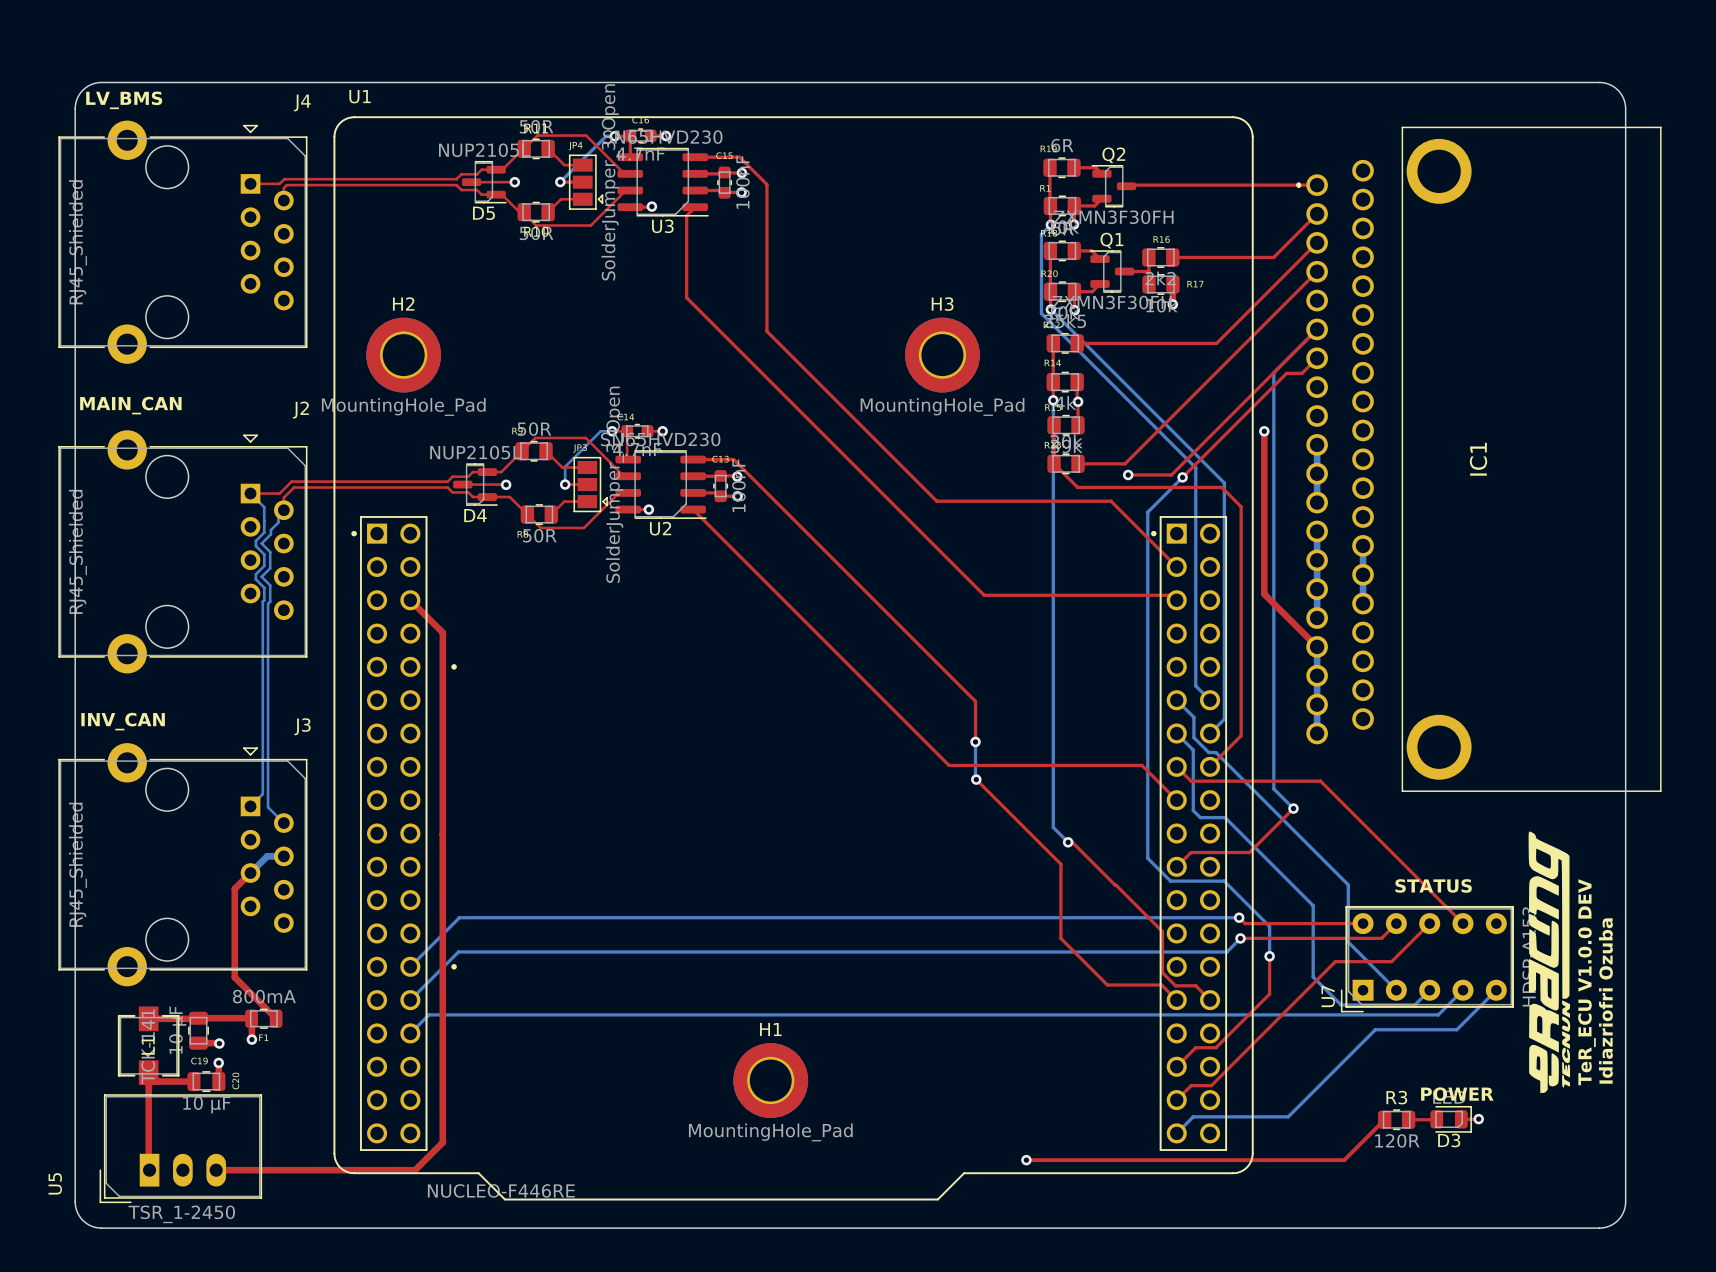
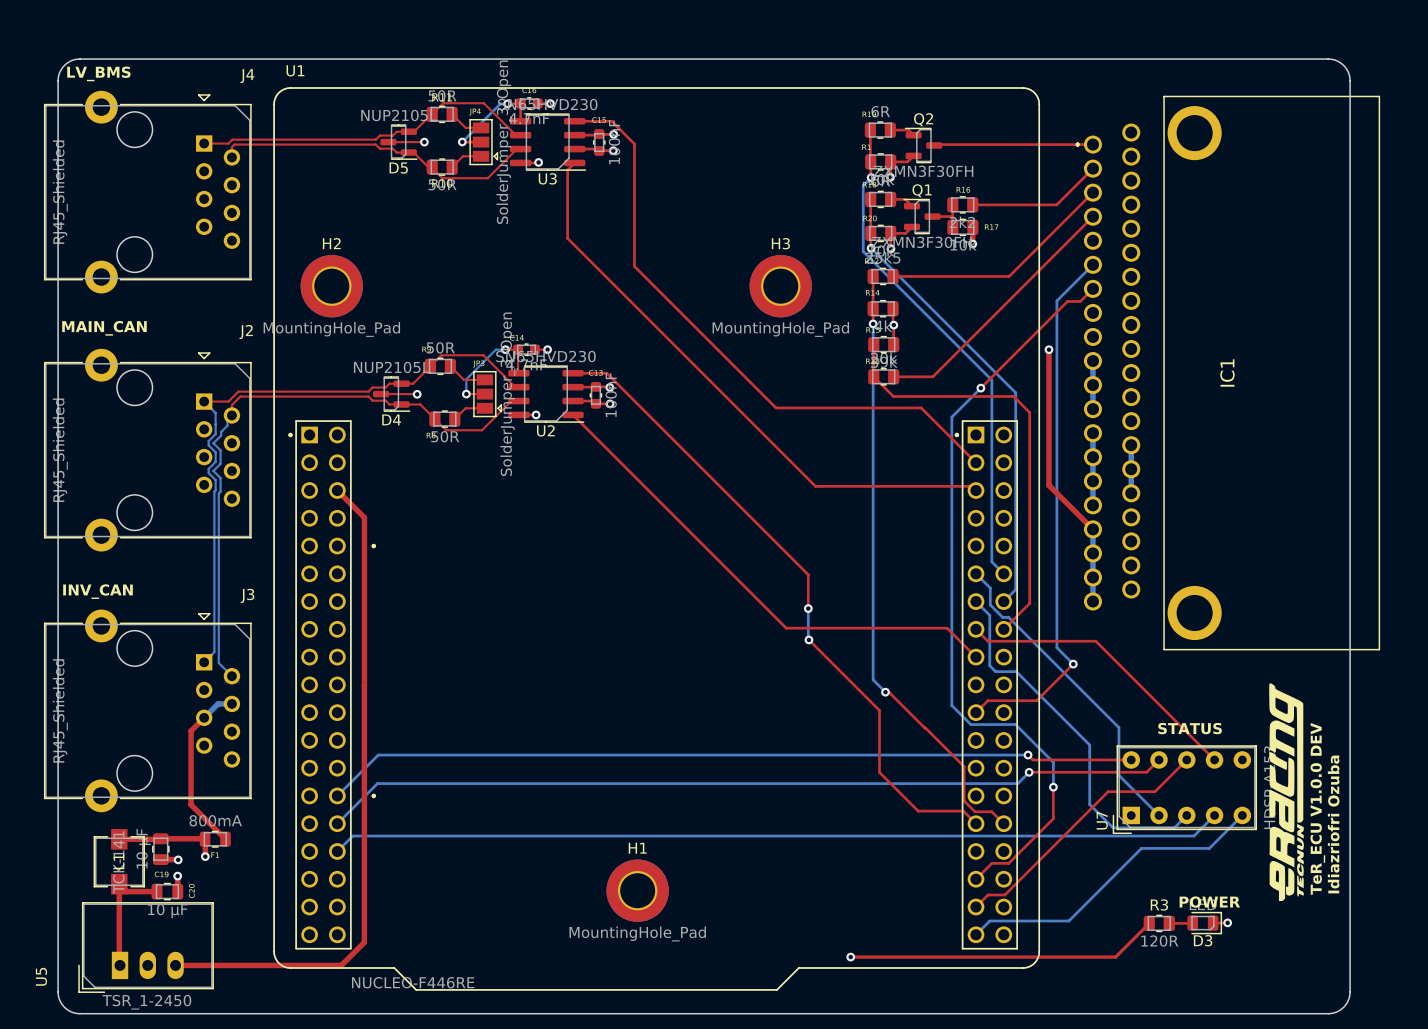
top track: (1317, 329) (1171, 474) (1128, 474) -> none
via: (1128, 474) -> none

